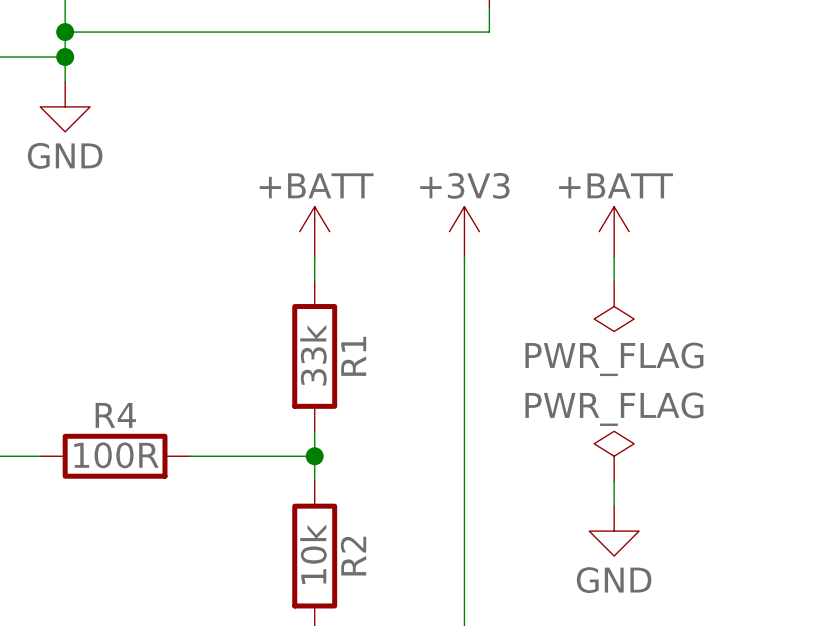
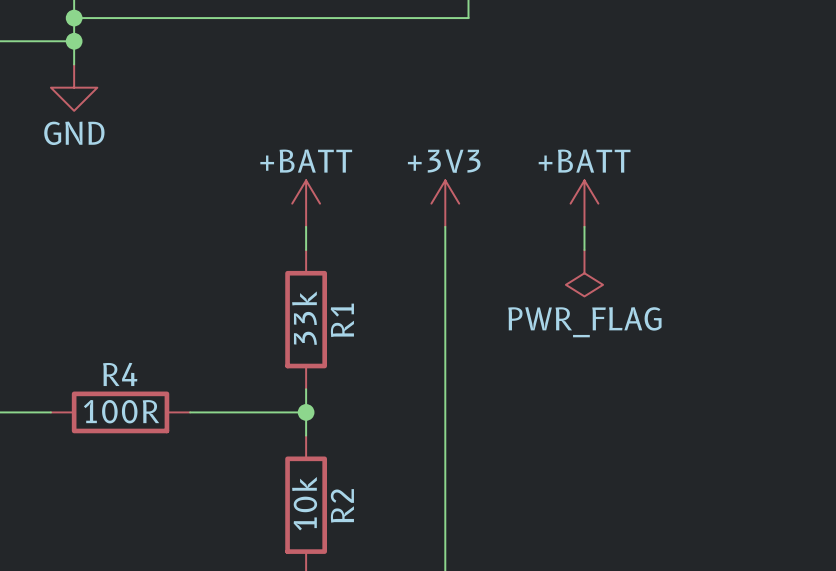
power symbol: PWR_FLAG (614, 456) -> none
wire: (614, 481) (614, 506) -> none
power symbol: GND (614, 531) -> none

